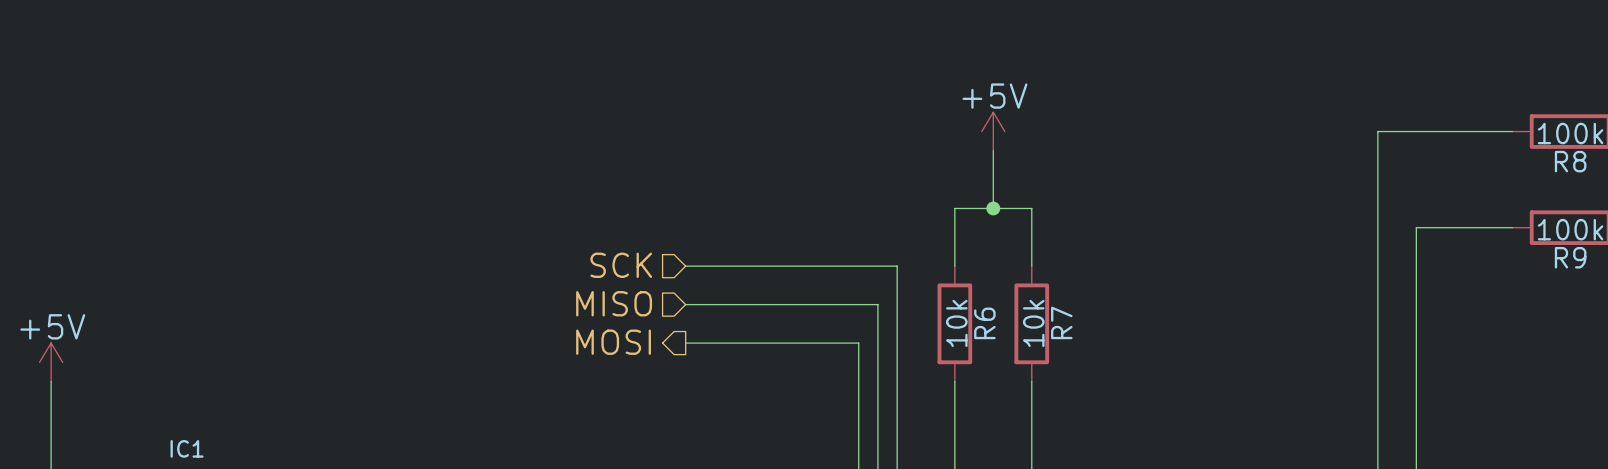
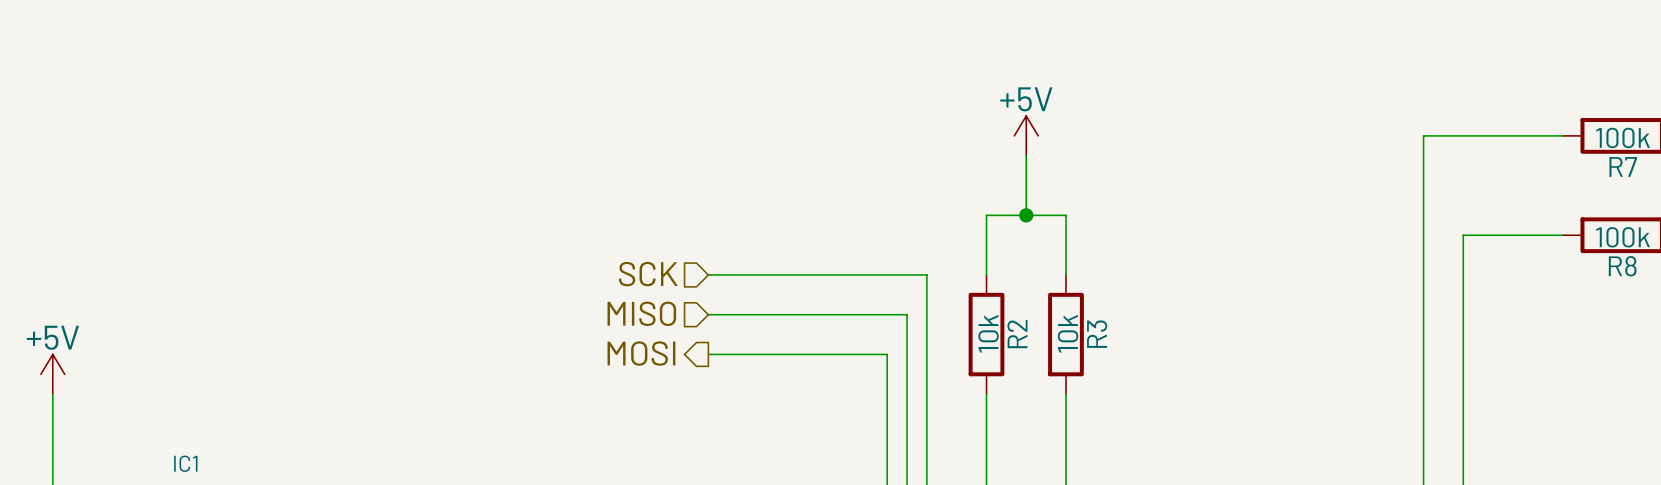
R8 name: R8 (1570, 161) -> R7 (1623, 166)
R9 name: R9 (1570, 257) -> R8 (1622, 266)
R7 name: R7 (1061, 322) -> R3 (1097, 334)
R6 name: R6 (984, 323) -> R2 (1017, 334)

